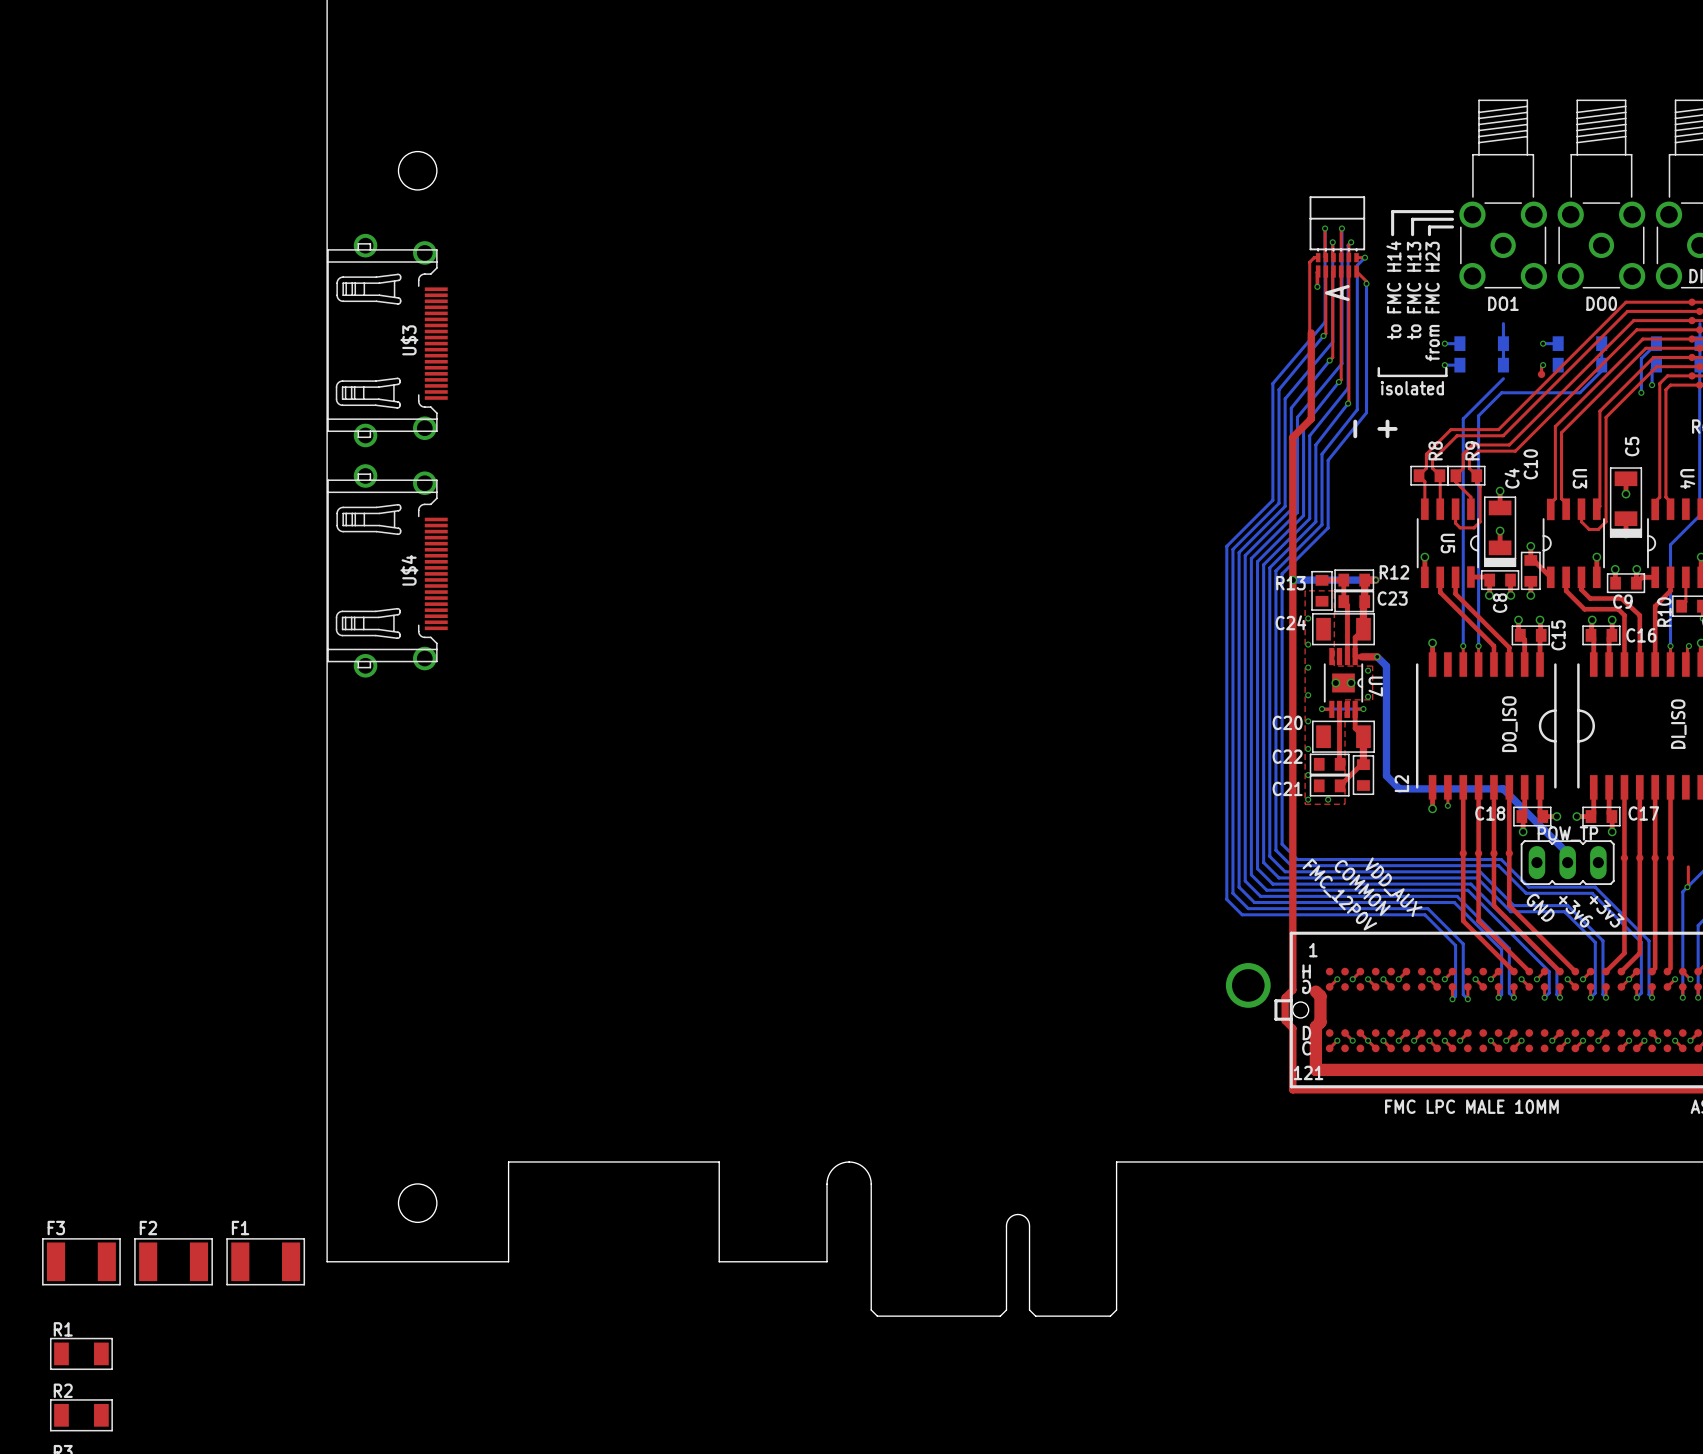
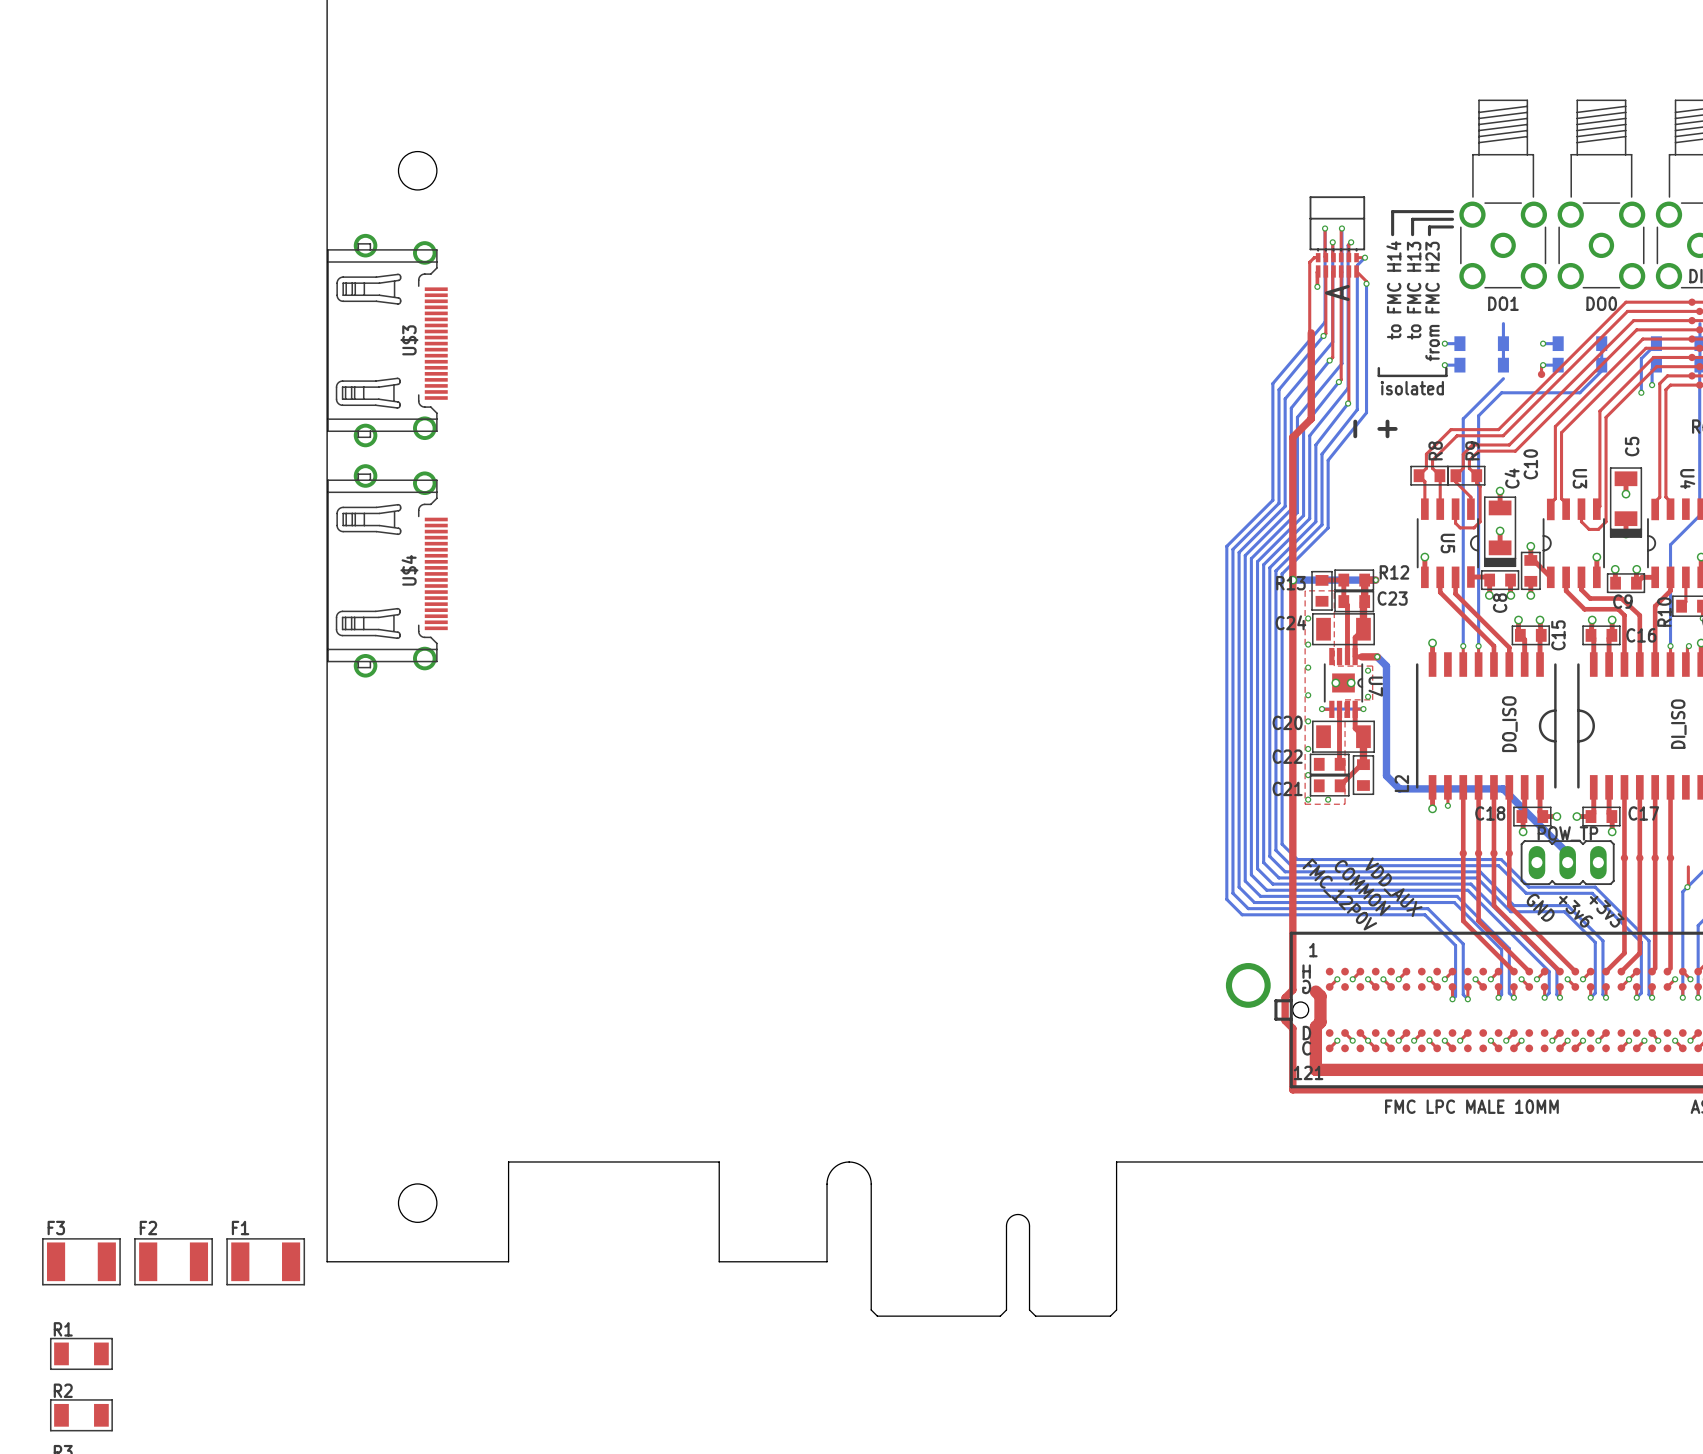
bottom track: none -> (1543, 365) (1558, 365)

